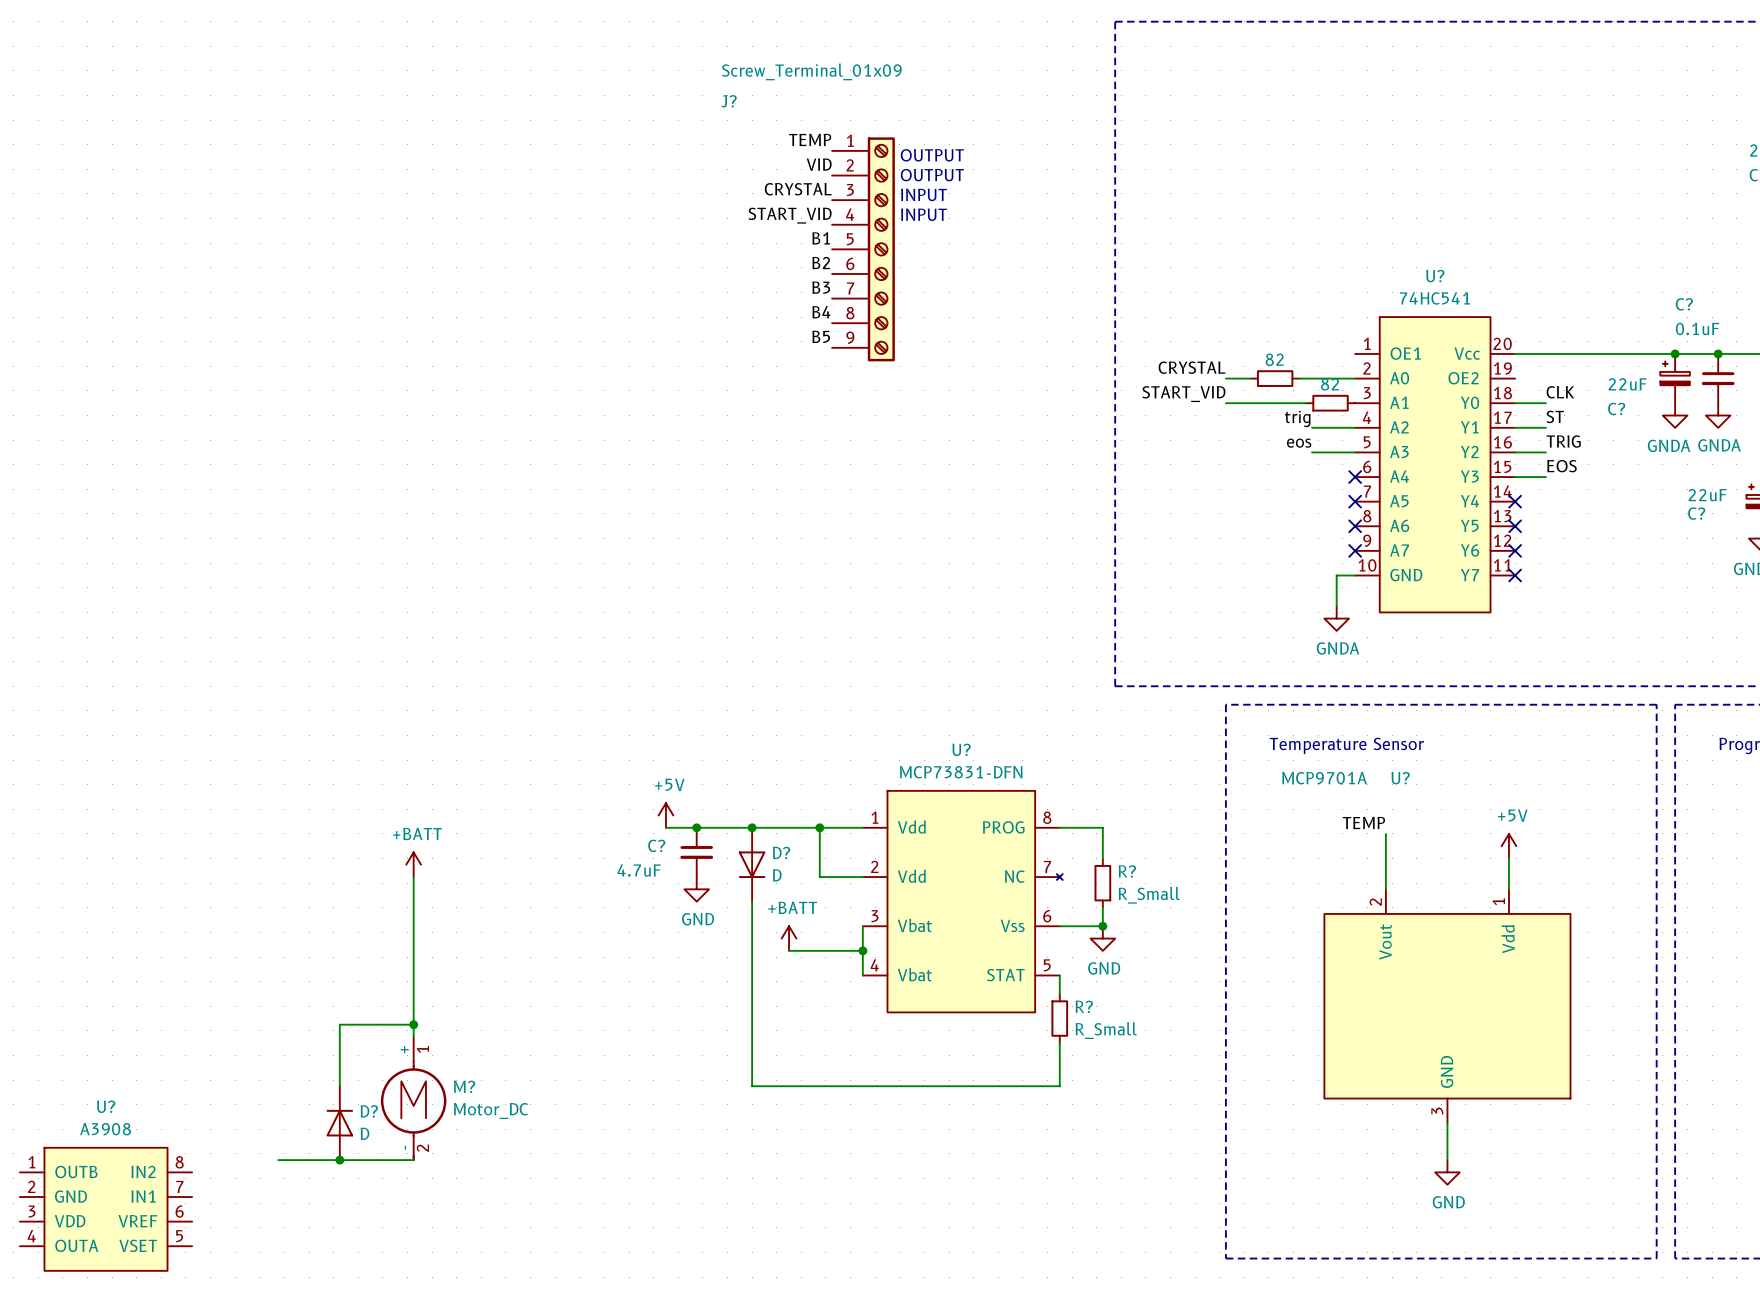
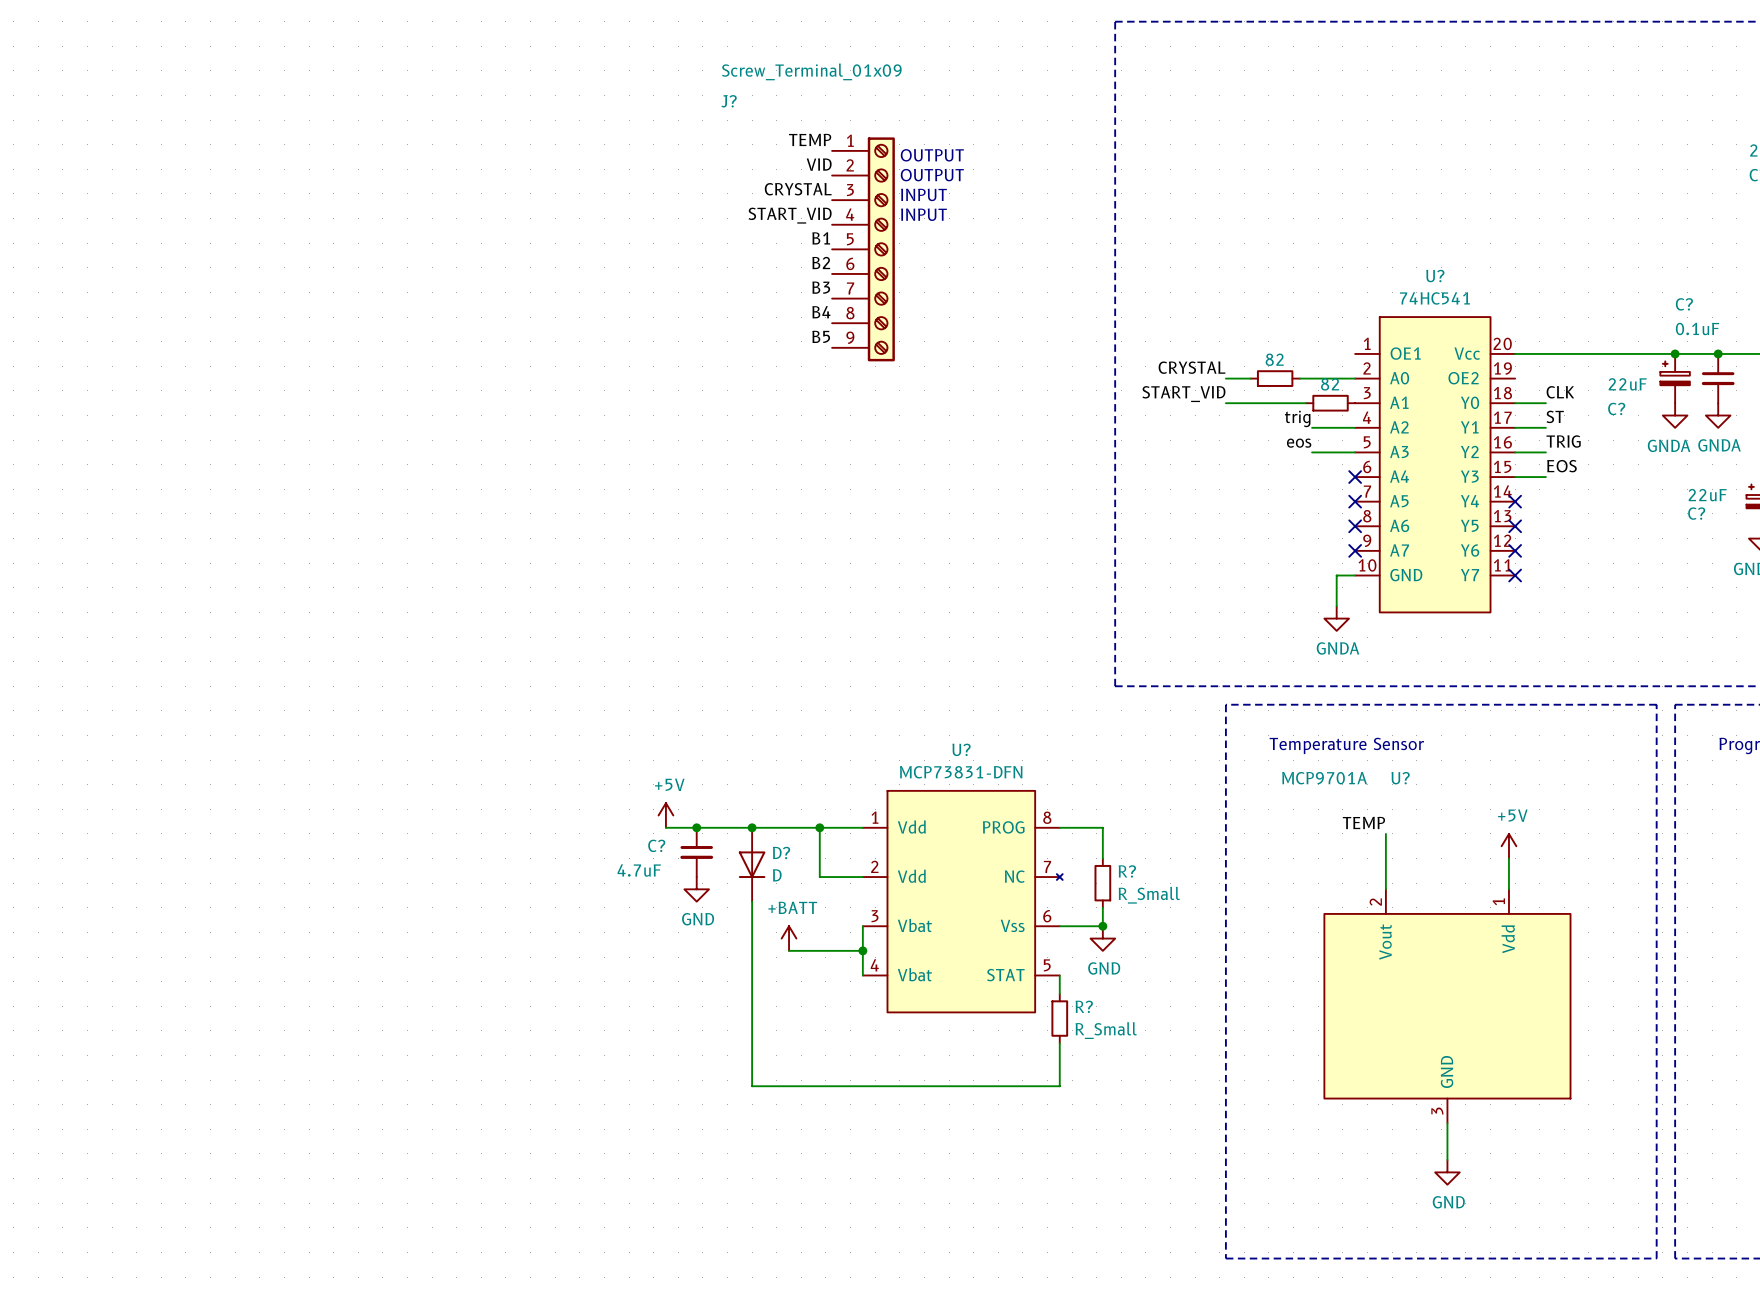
power symbol: +BATT (413, 864) -> none
wire: (413, 877) (413, 1037) -> none
wire: (413, 1024) (339, 1024) (339, 1086) -> none
junction: (413, 1024) -> none
M?: Motor_DC (413, 1098) -> none
D?: D (339, 1123) -> none
wire: (278, 1160) (413, 1160) -> none
junction: (339, 1160) -> none
U?: A3908 (105, 1209) -> none

